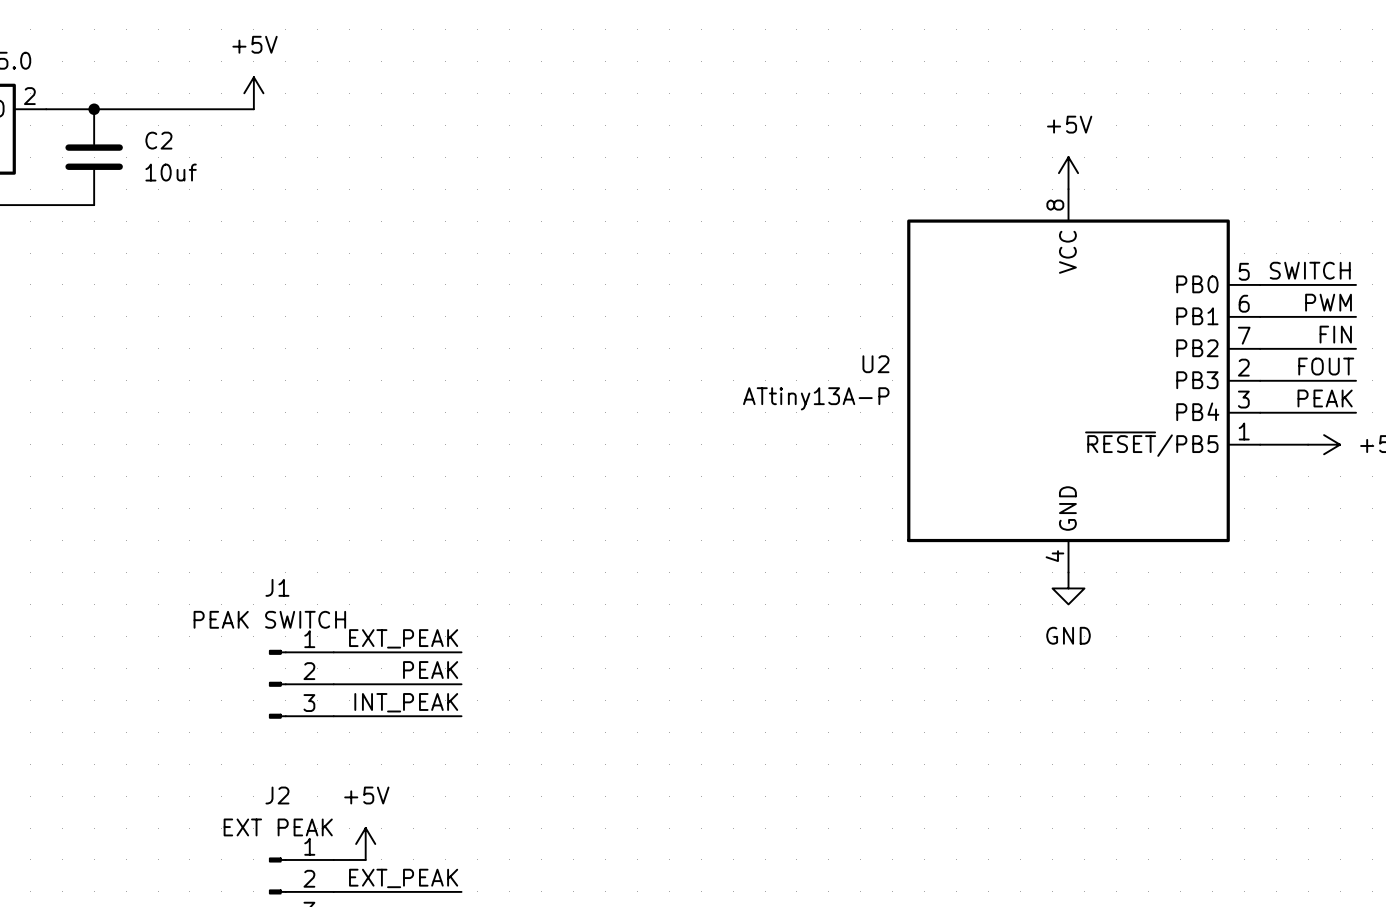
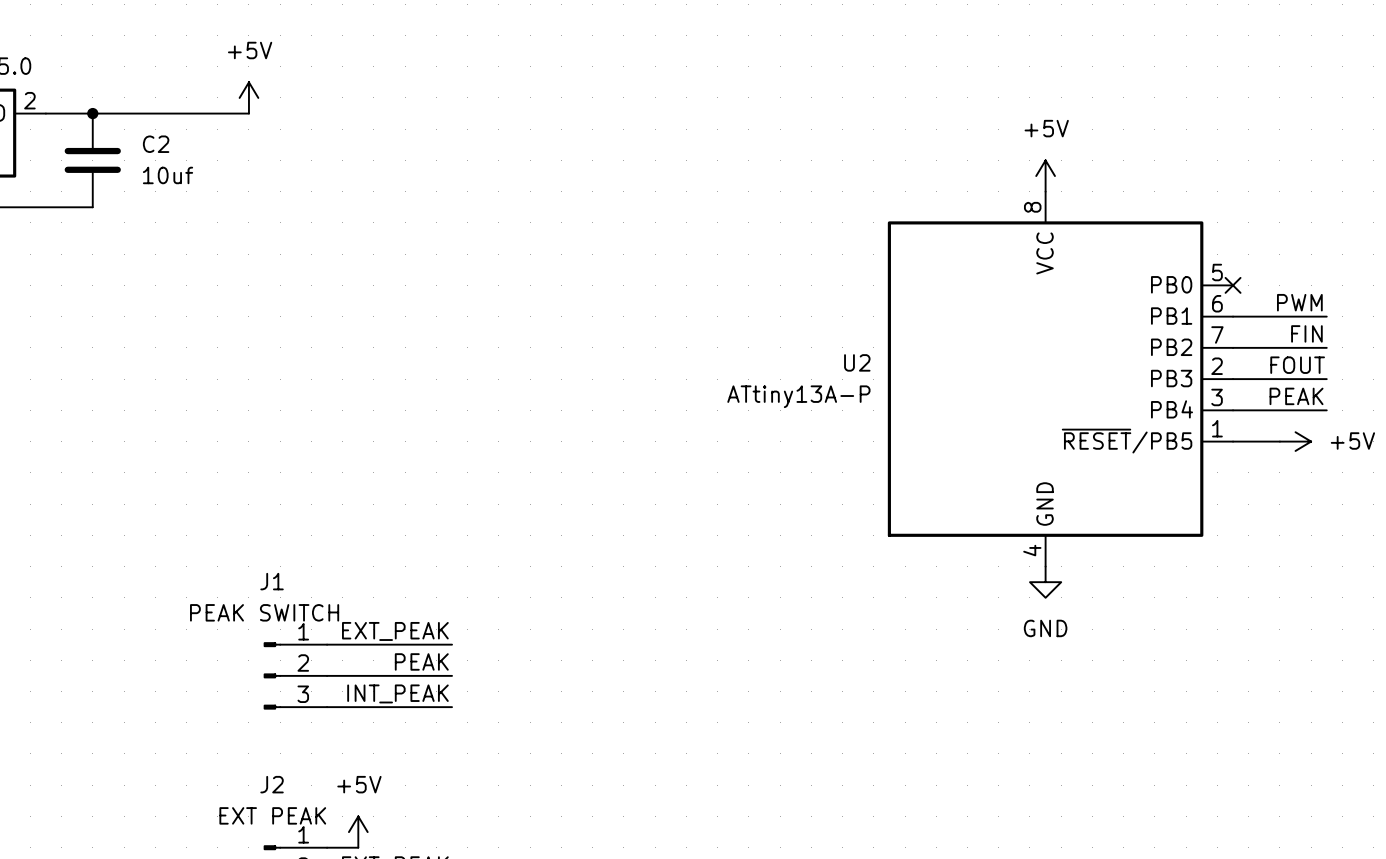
label: SWITCH (1310, 270) -> none
wire: (1260, 284) (1356, 284) -> none
no-connect mark: none -> (1233, 285)

